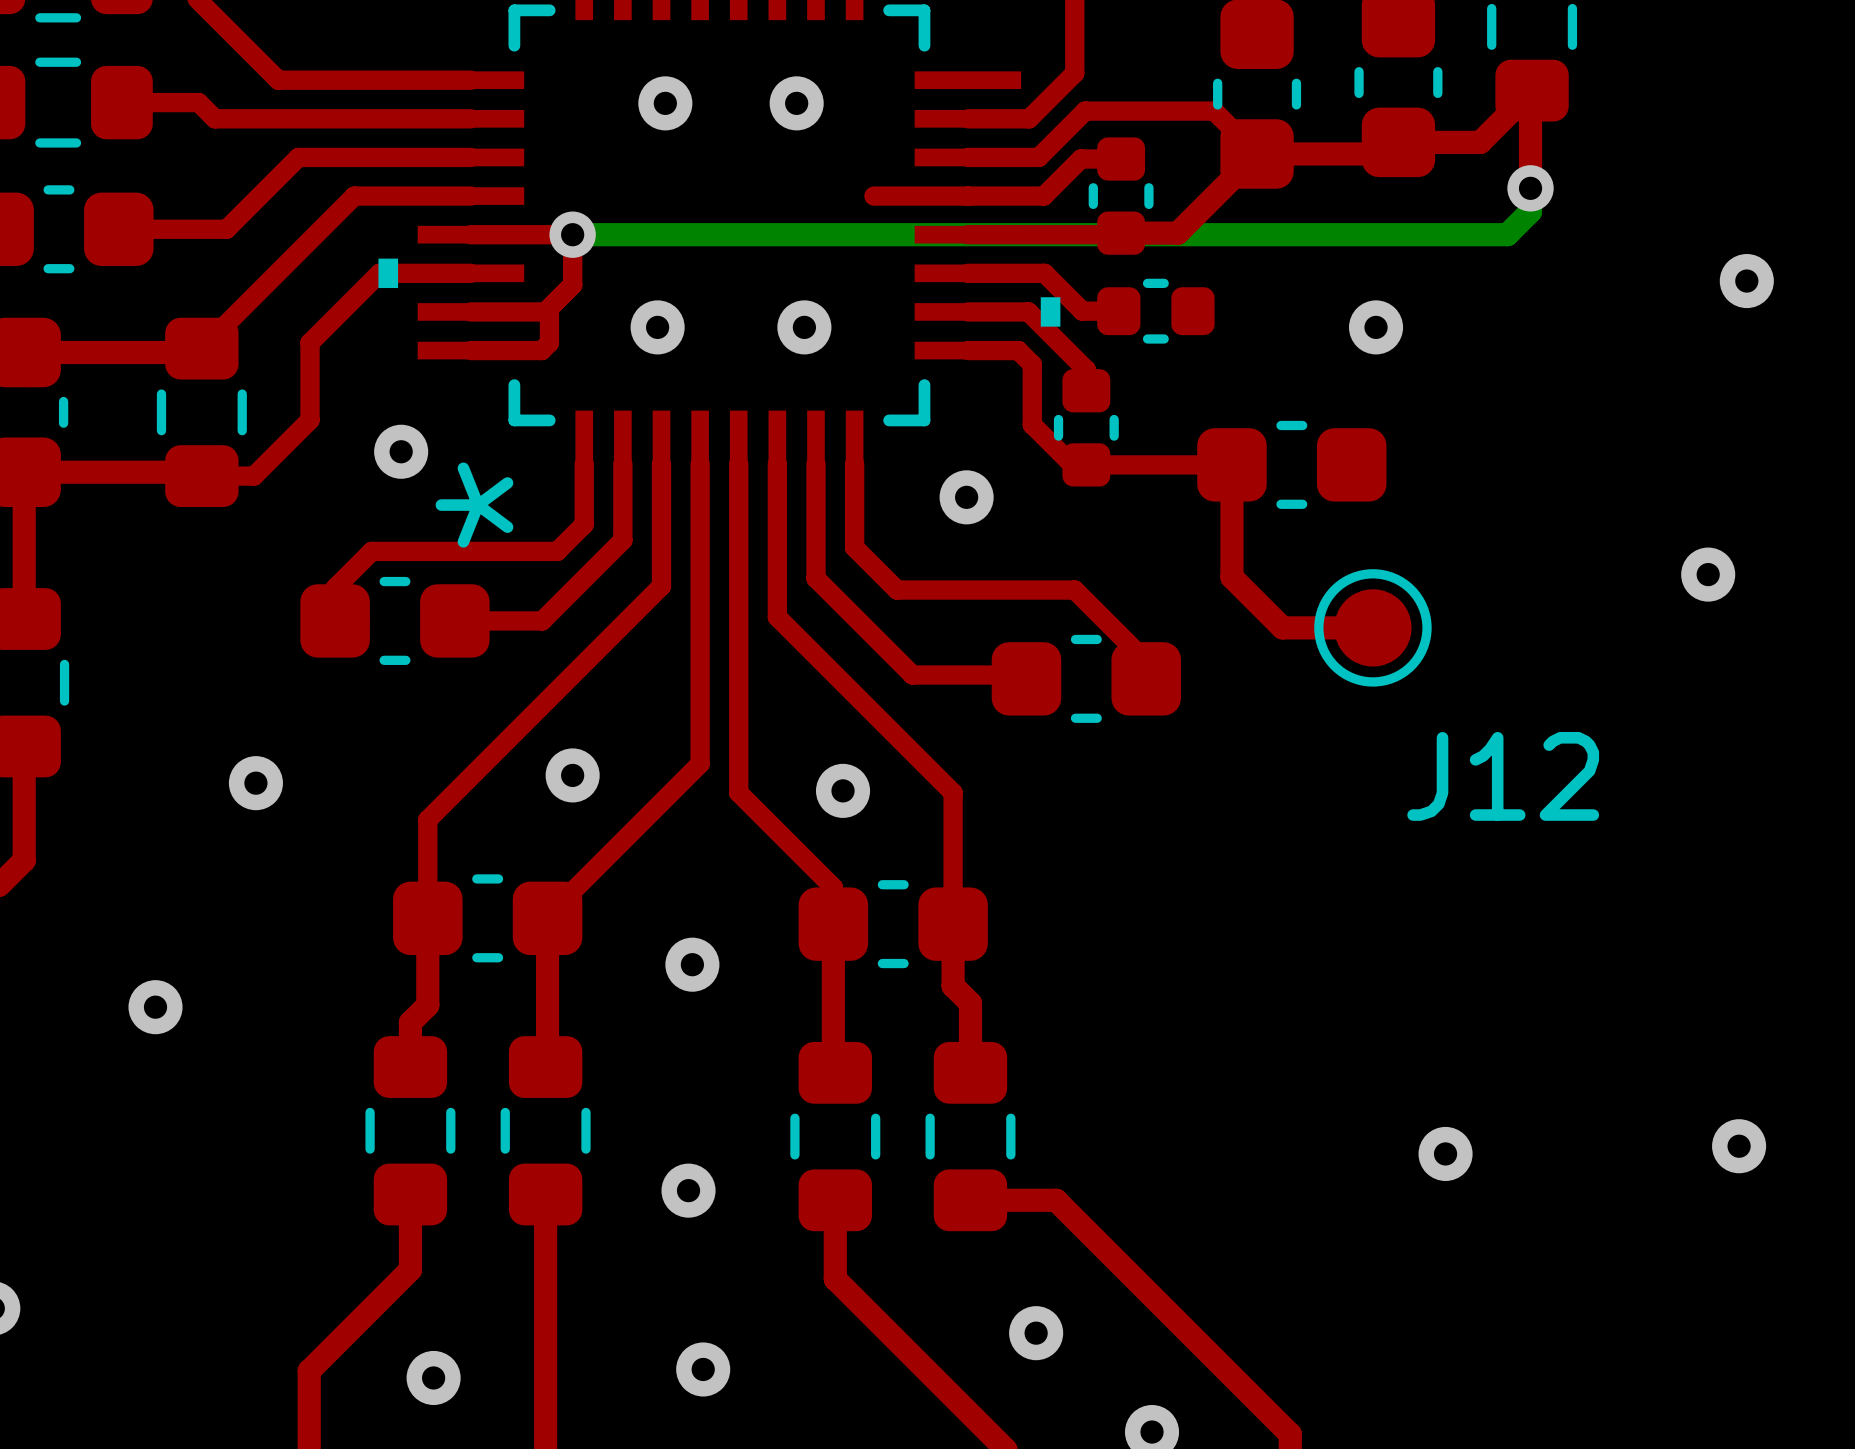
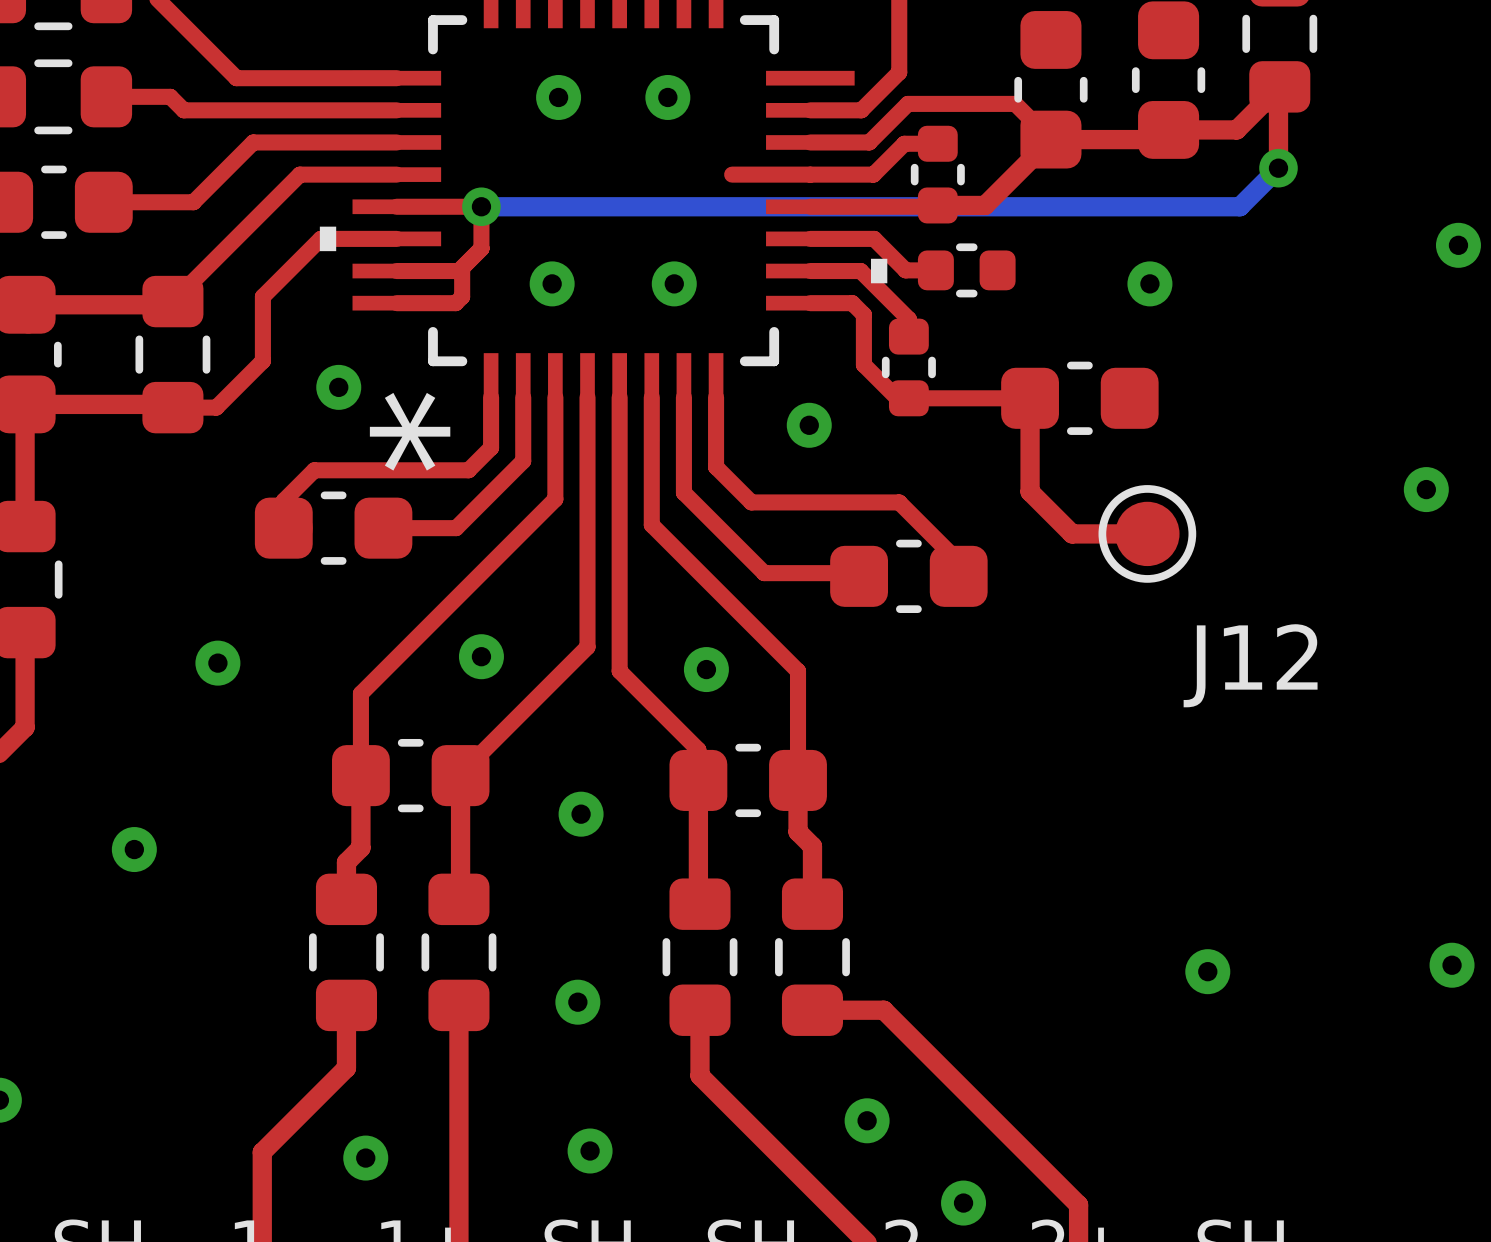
bottom track: (1530, 188) (1530, 211) (1507, 234) (1484, 234) -> (1278, 168) (1239, 206)

